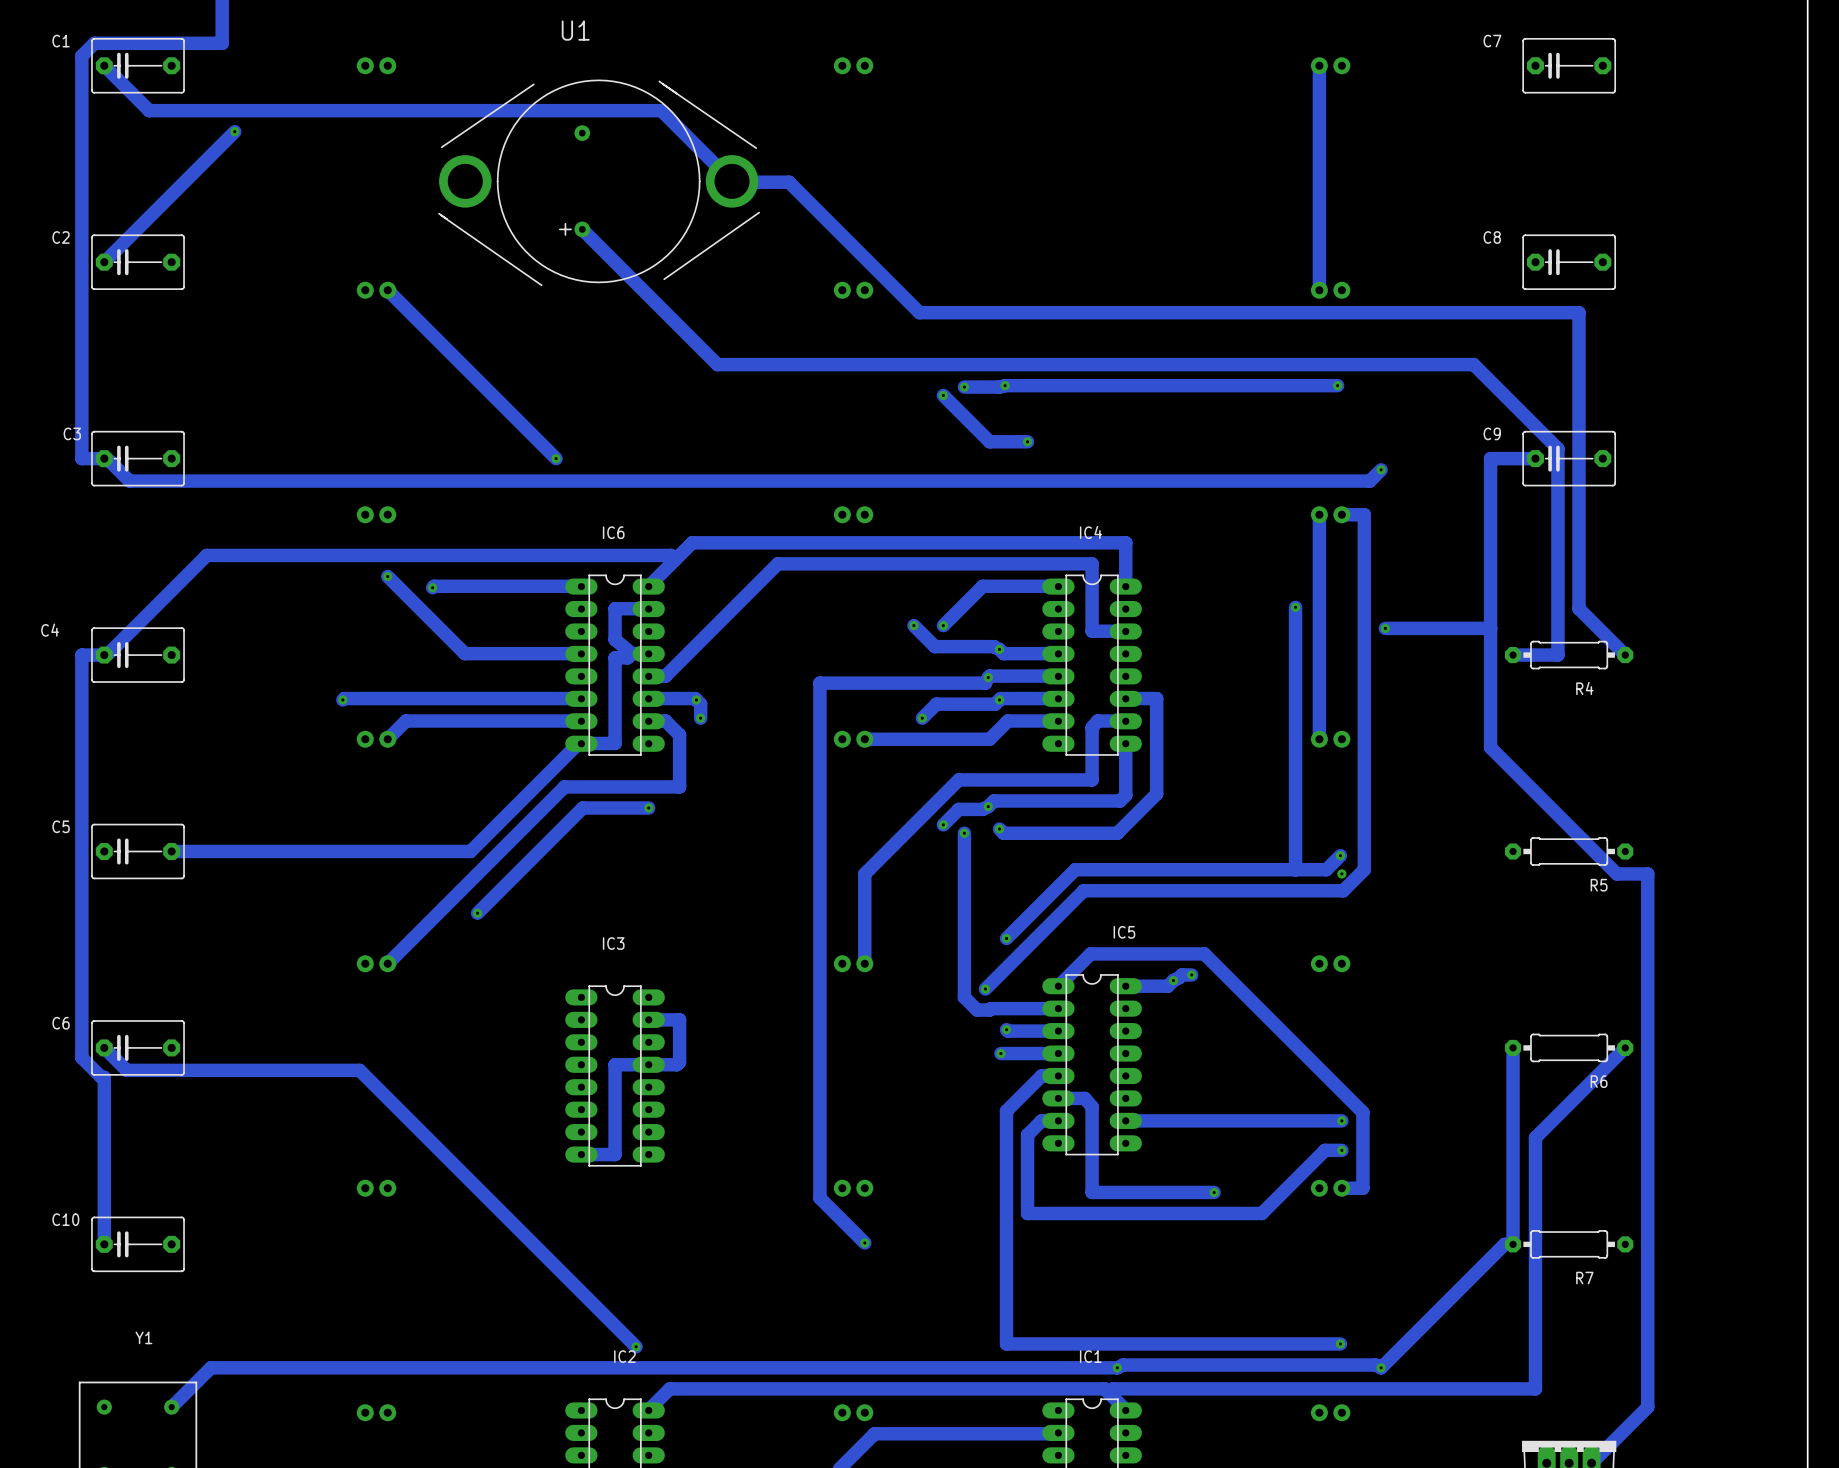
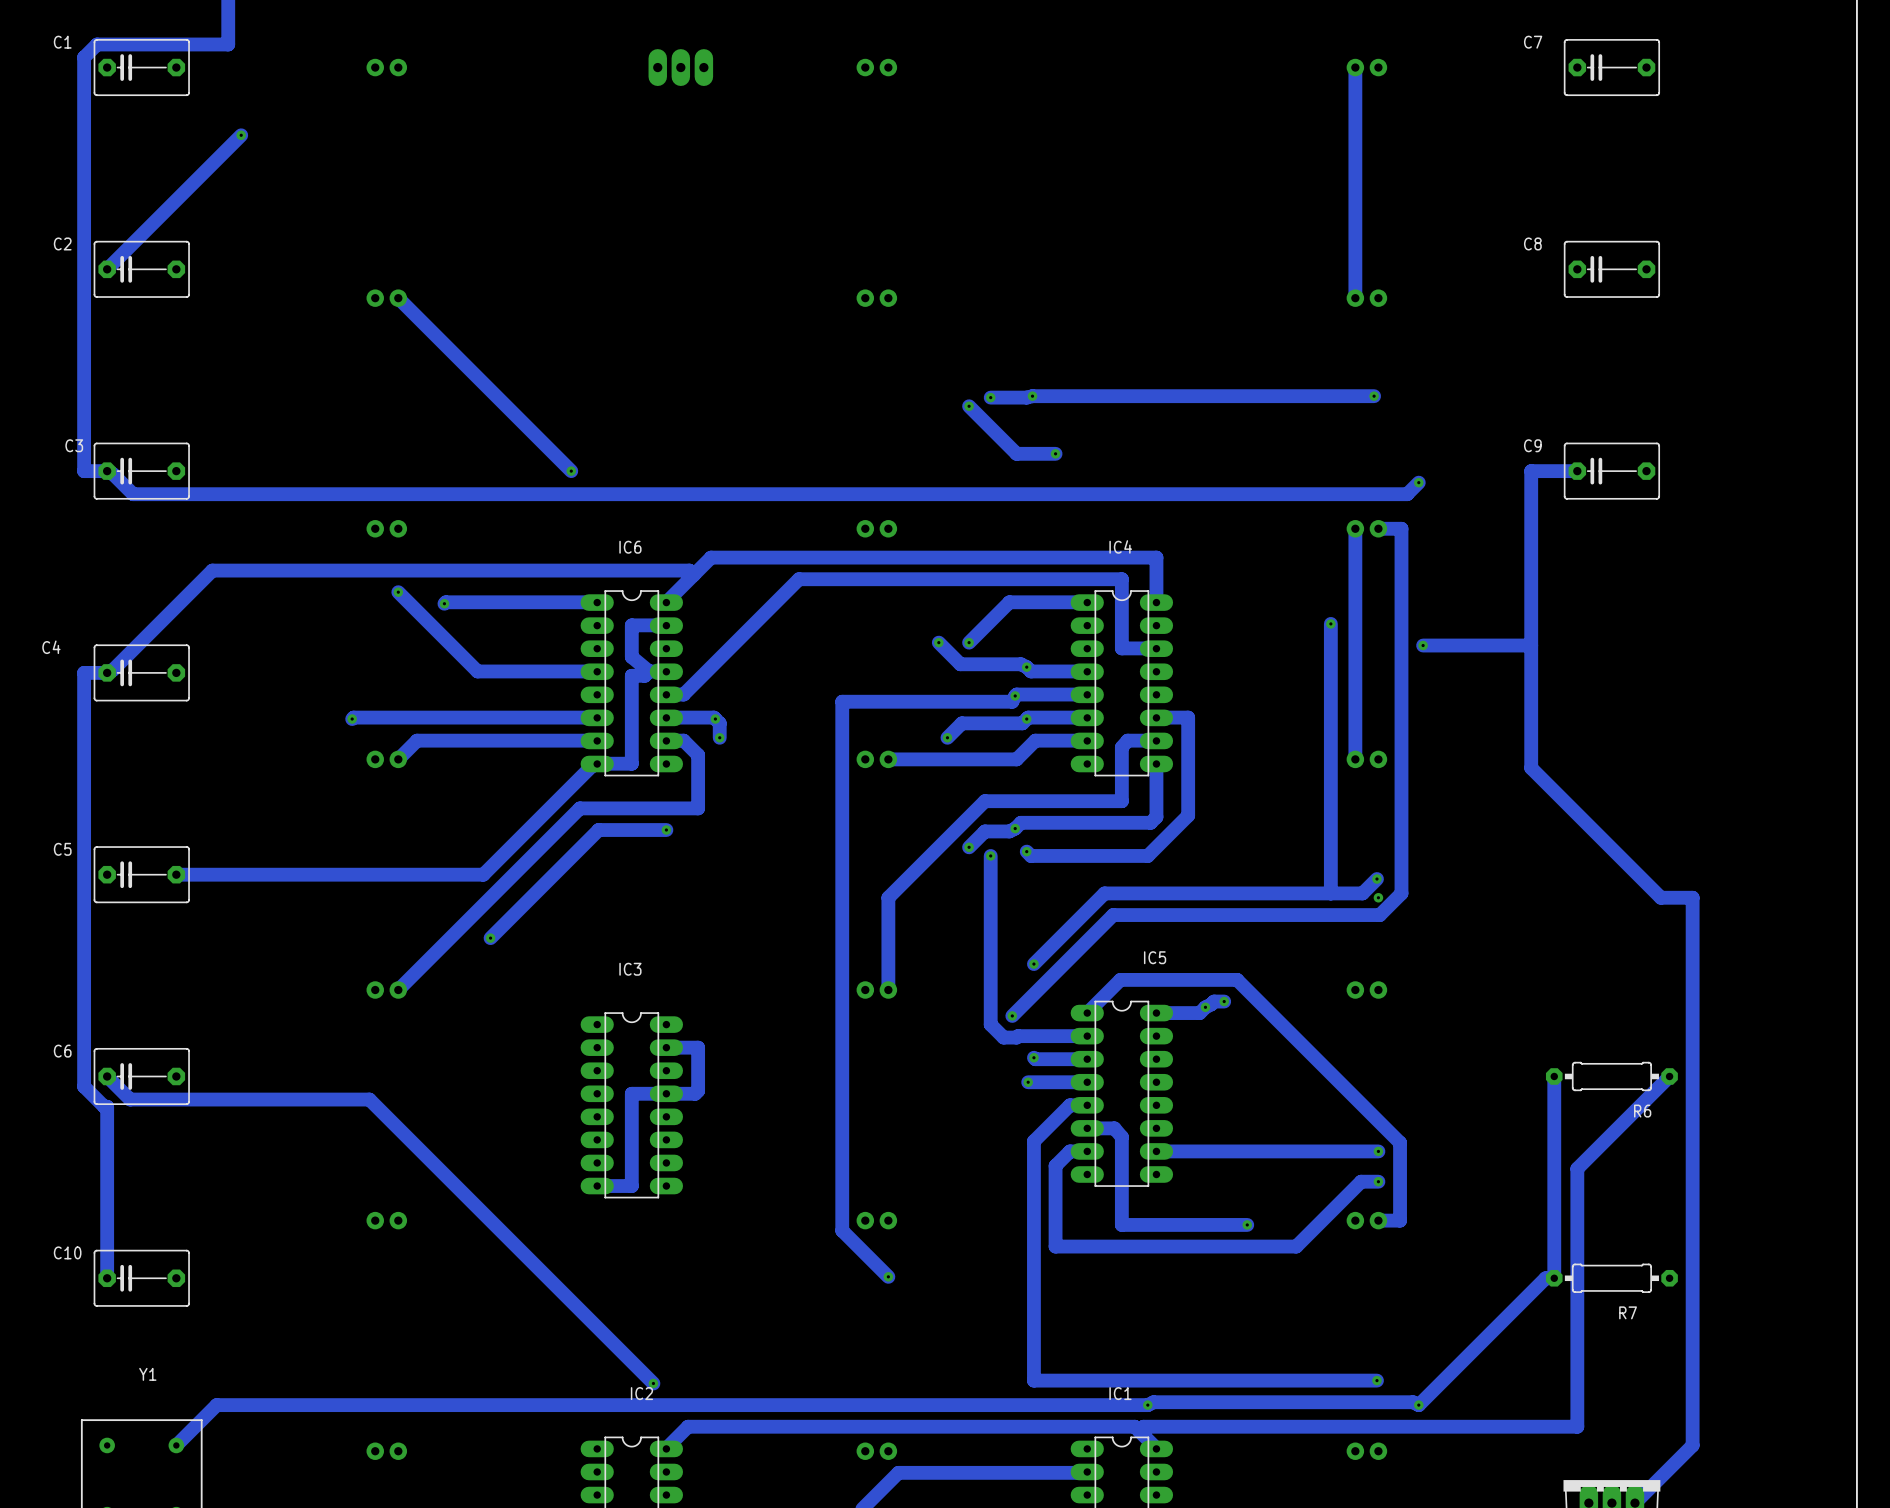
track: (104, 65) (149, 110) (661, 110) (732, 182) (789, 182) (919, 312) (1578, 312) (1578, 608) (1625, 655) -> none
part: none -> (680, 67)
U1: (599, 182) -> none
track: (582, 229) (717, 364) (1473, 364) (1557, 448) (1557, 655) (1513, 655) -> none
R4: (1569, 655) -> none
R5: (1569, 851) -> none

